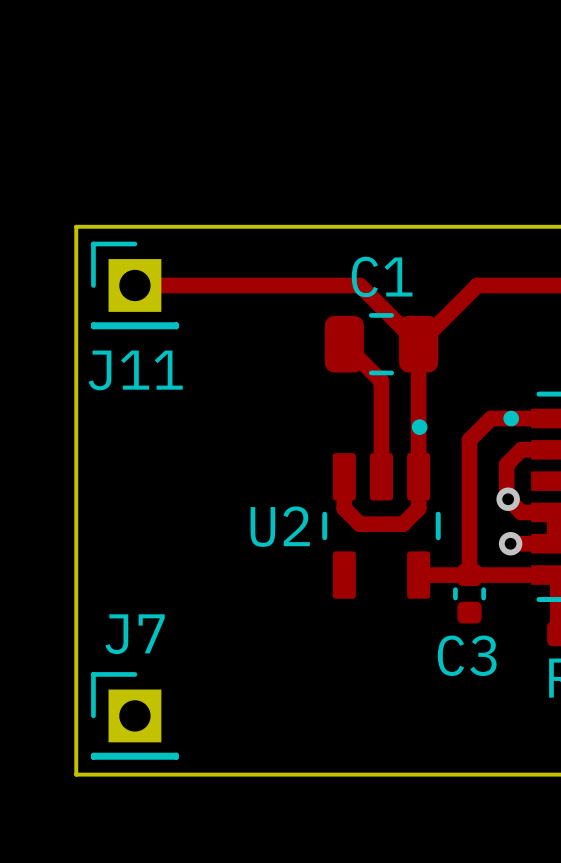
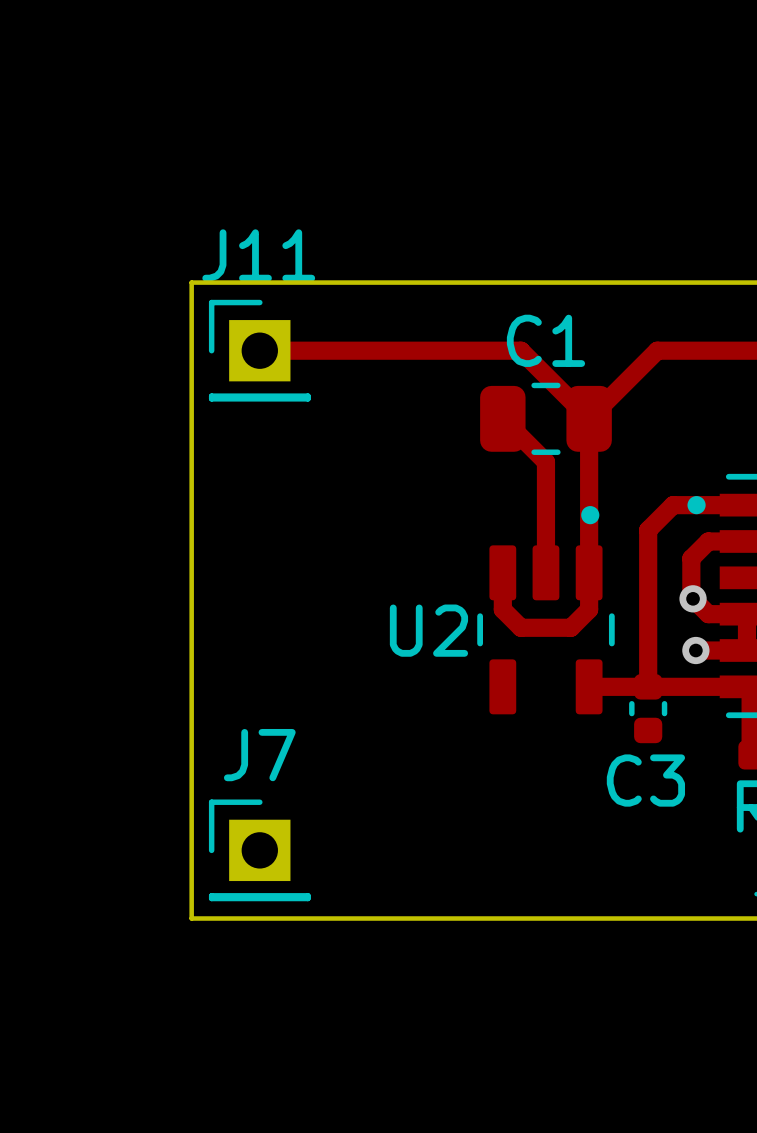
J11 name position: J11 (135, 370) -> J11 (258, 255)

